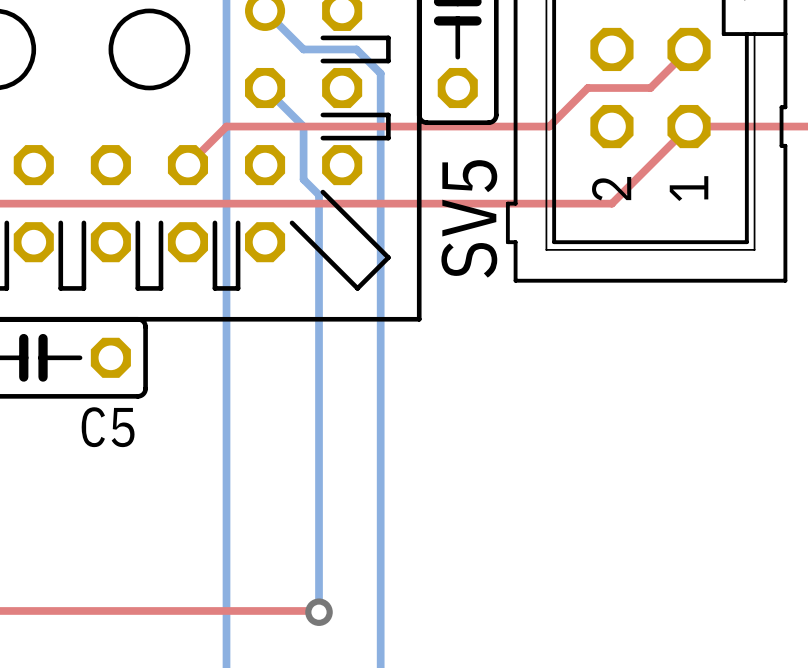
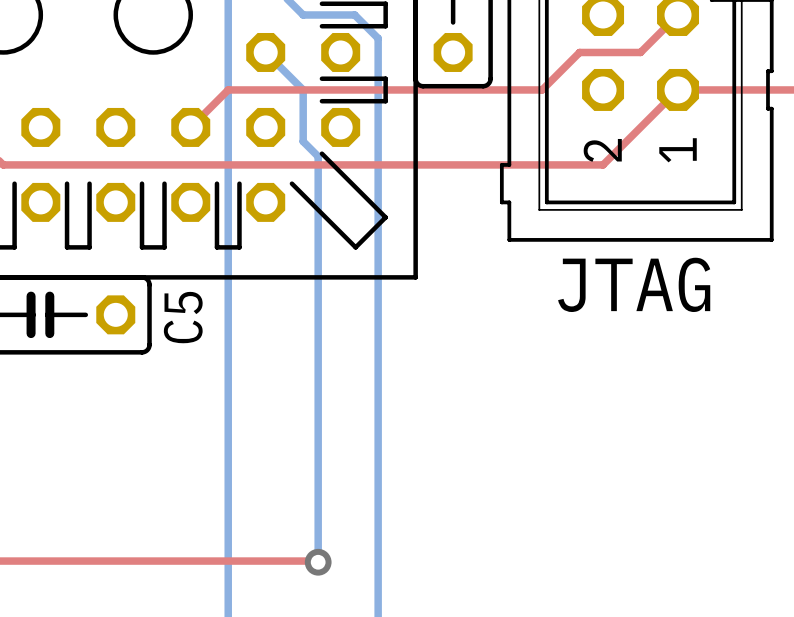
SV5 name: SV5 (469, 218) -> JTAG (634, 284)
C5 name rotation: 0° (108, 427) -> 90° counterclockwise (183, 317)
C5 name position: C5 (108, 427) -> C5 (183, 317)

